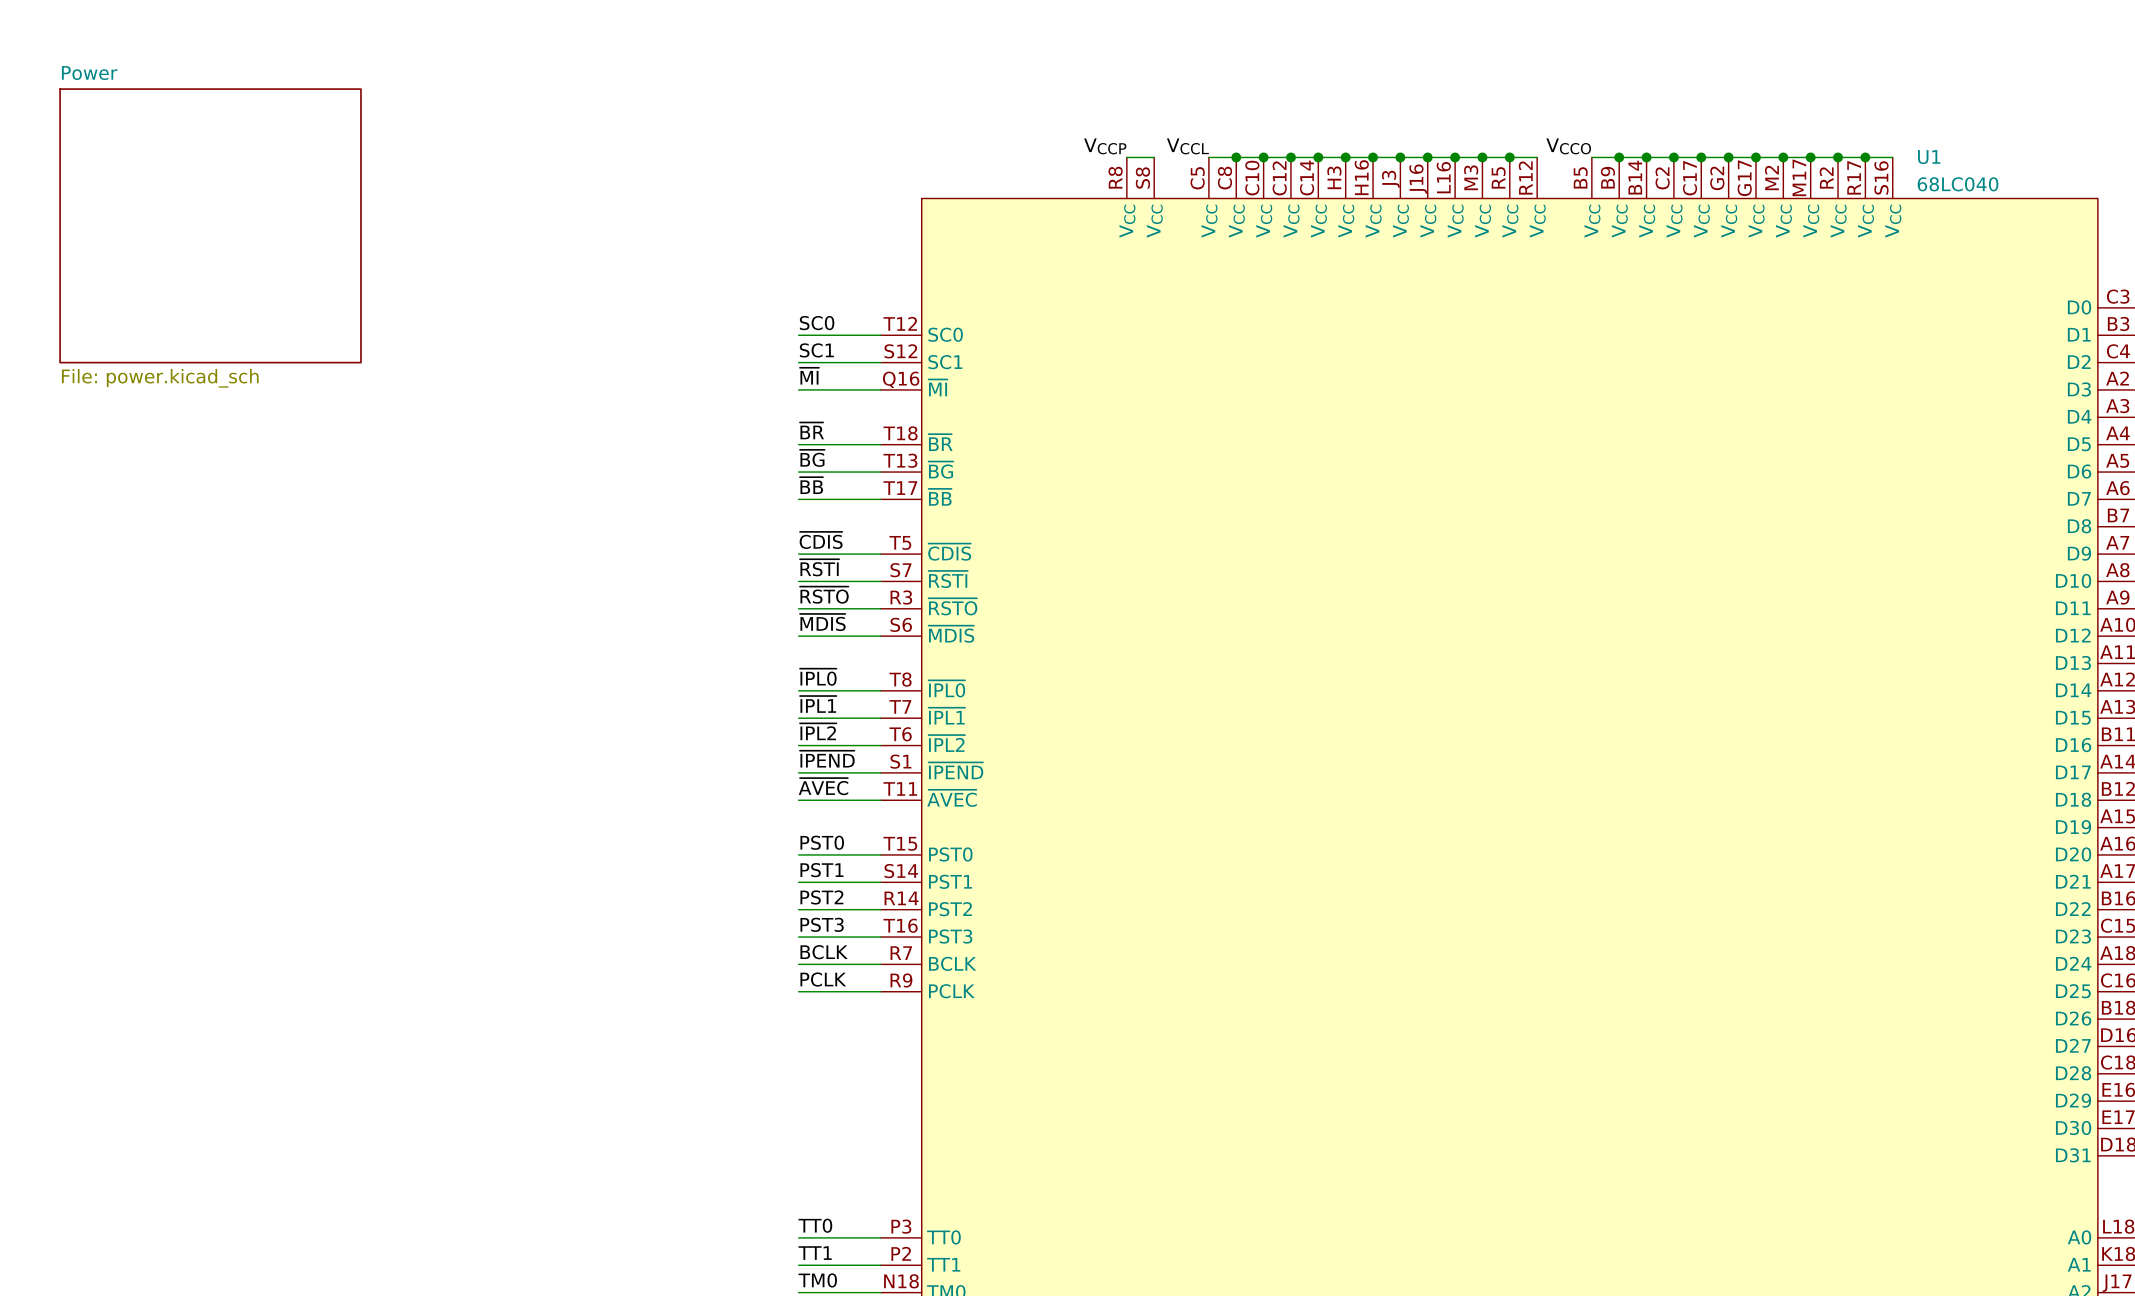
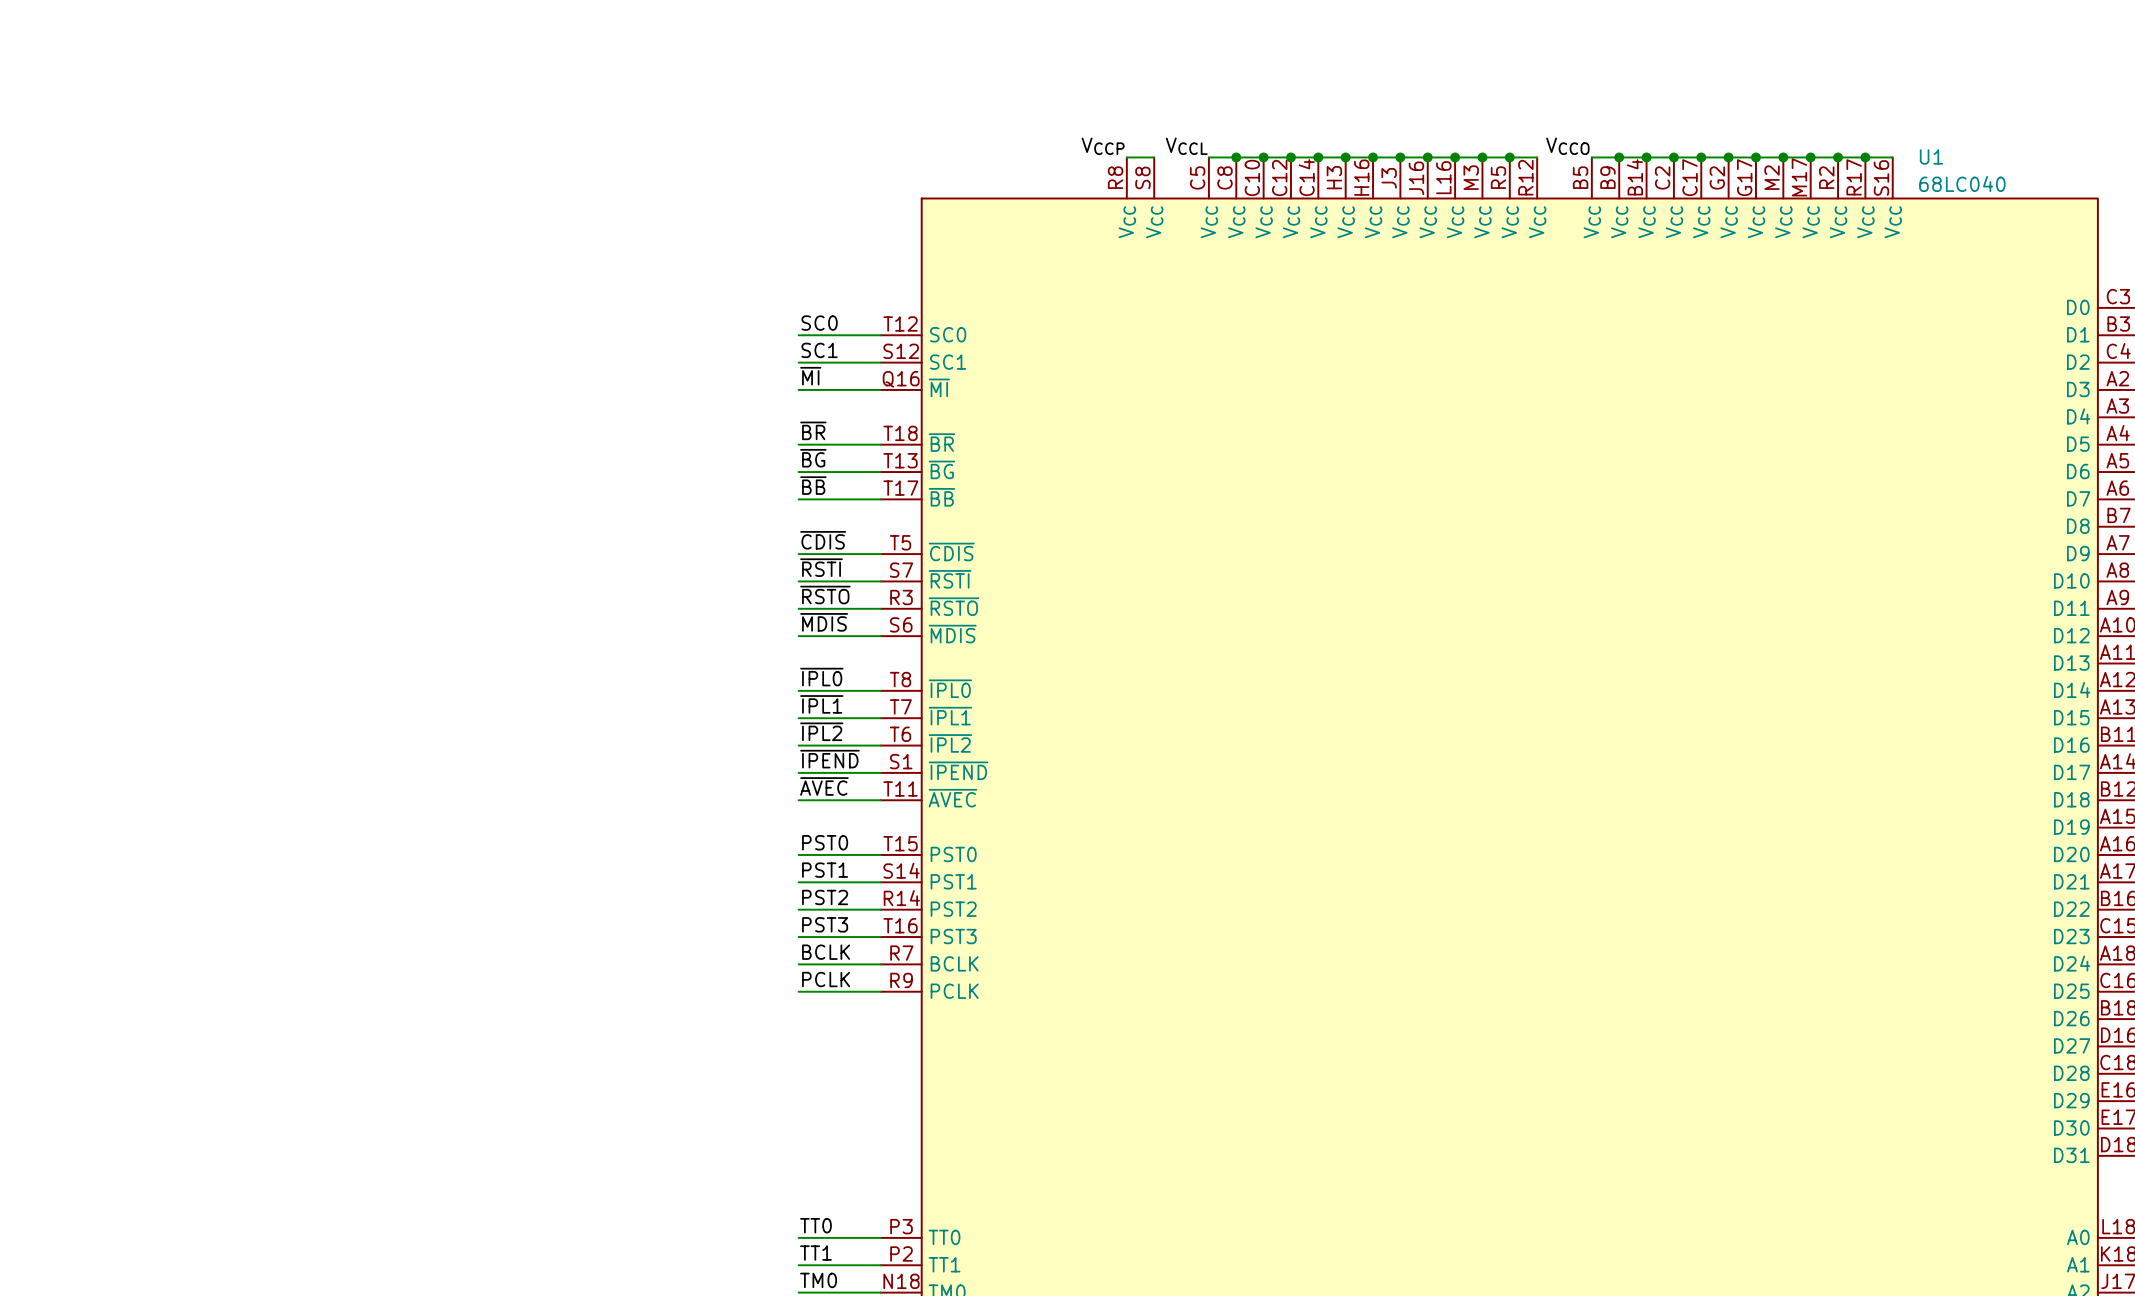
sheet Power: File: power.kicad_sch (210, 225) -> none

